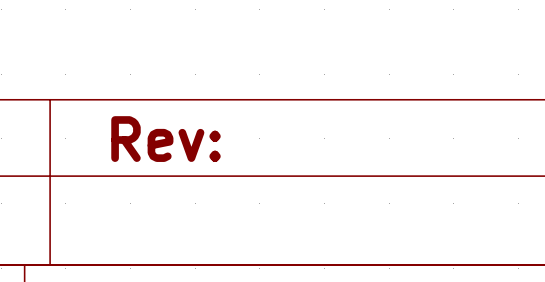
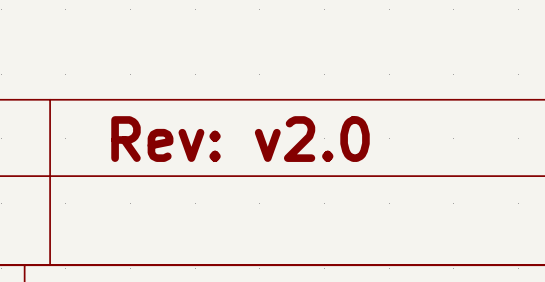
title block: Rev: (165, 139) -> Rev: v2.0 (240, 139)

